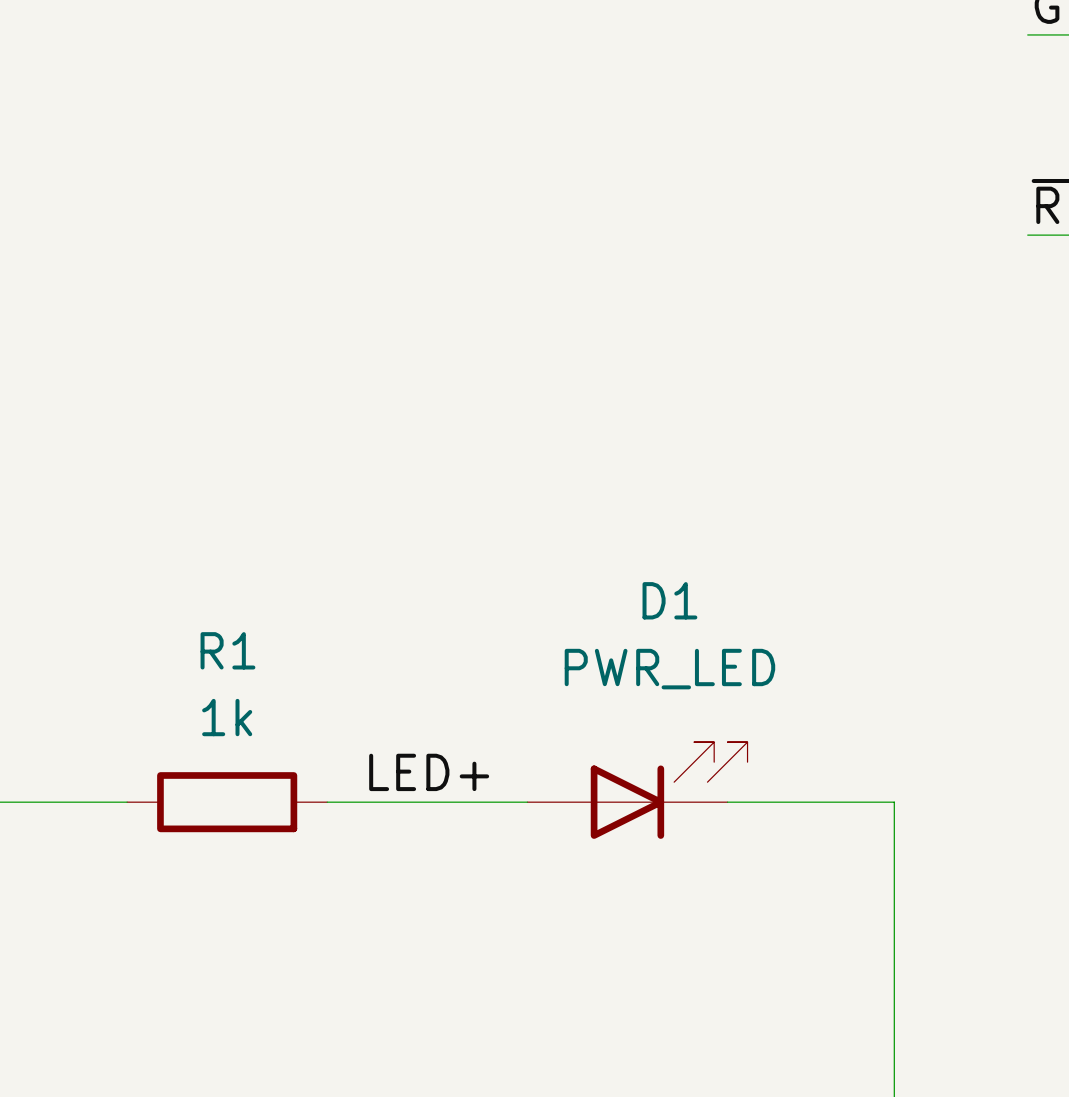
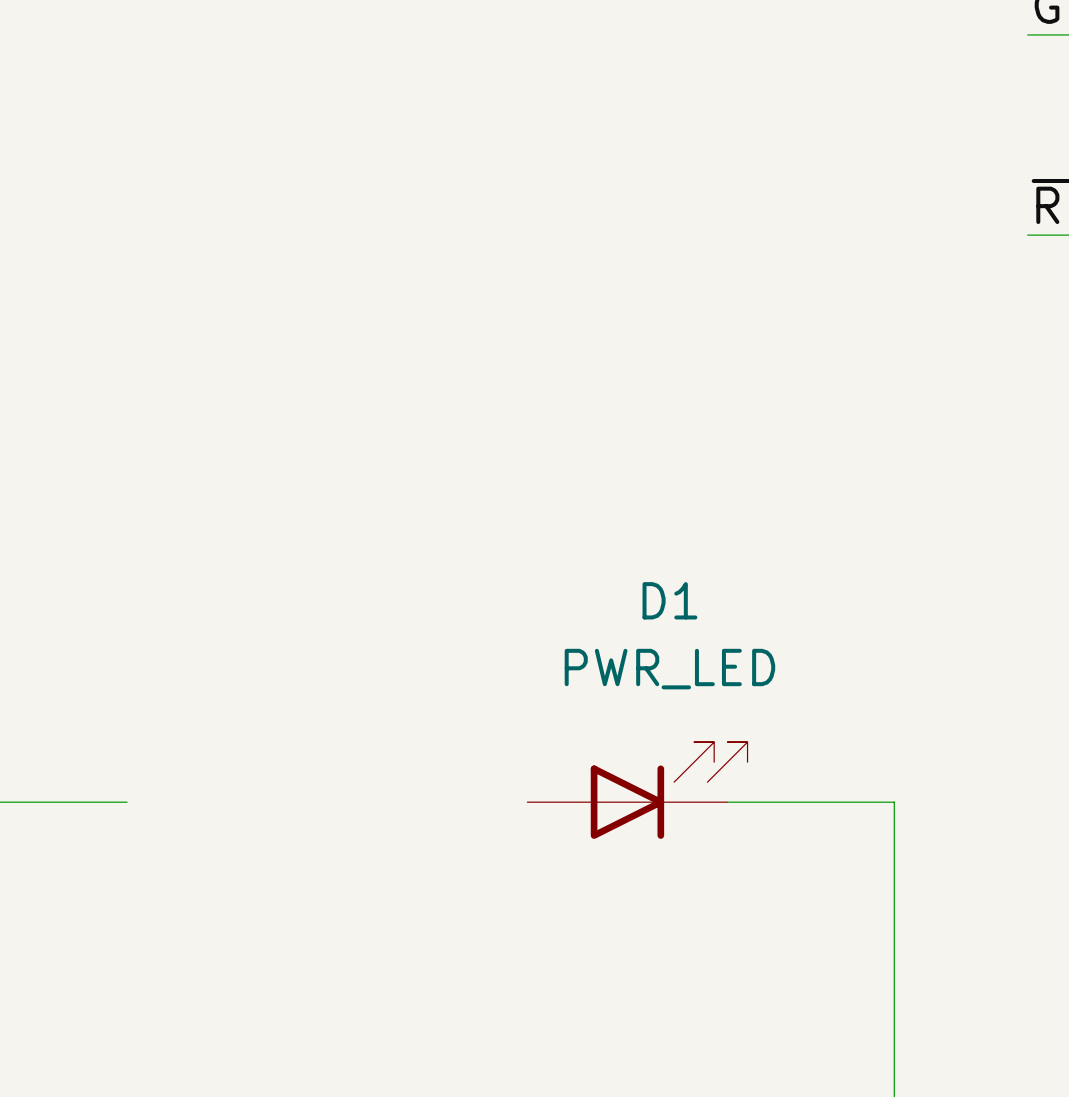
label: LED+ (429, 772) -> none
R1: 1k (227, 802) -> none
wire: (327, 802) (527, 802) -> none

